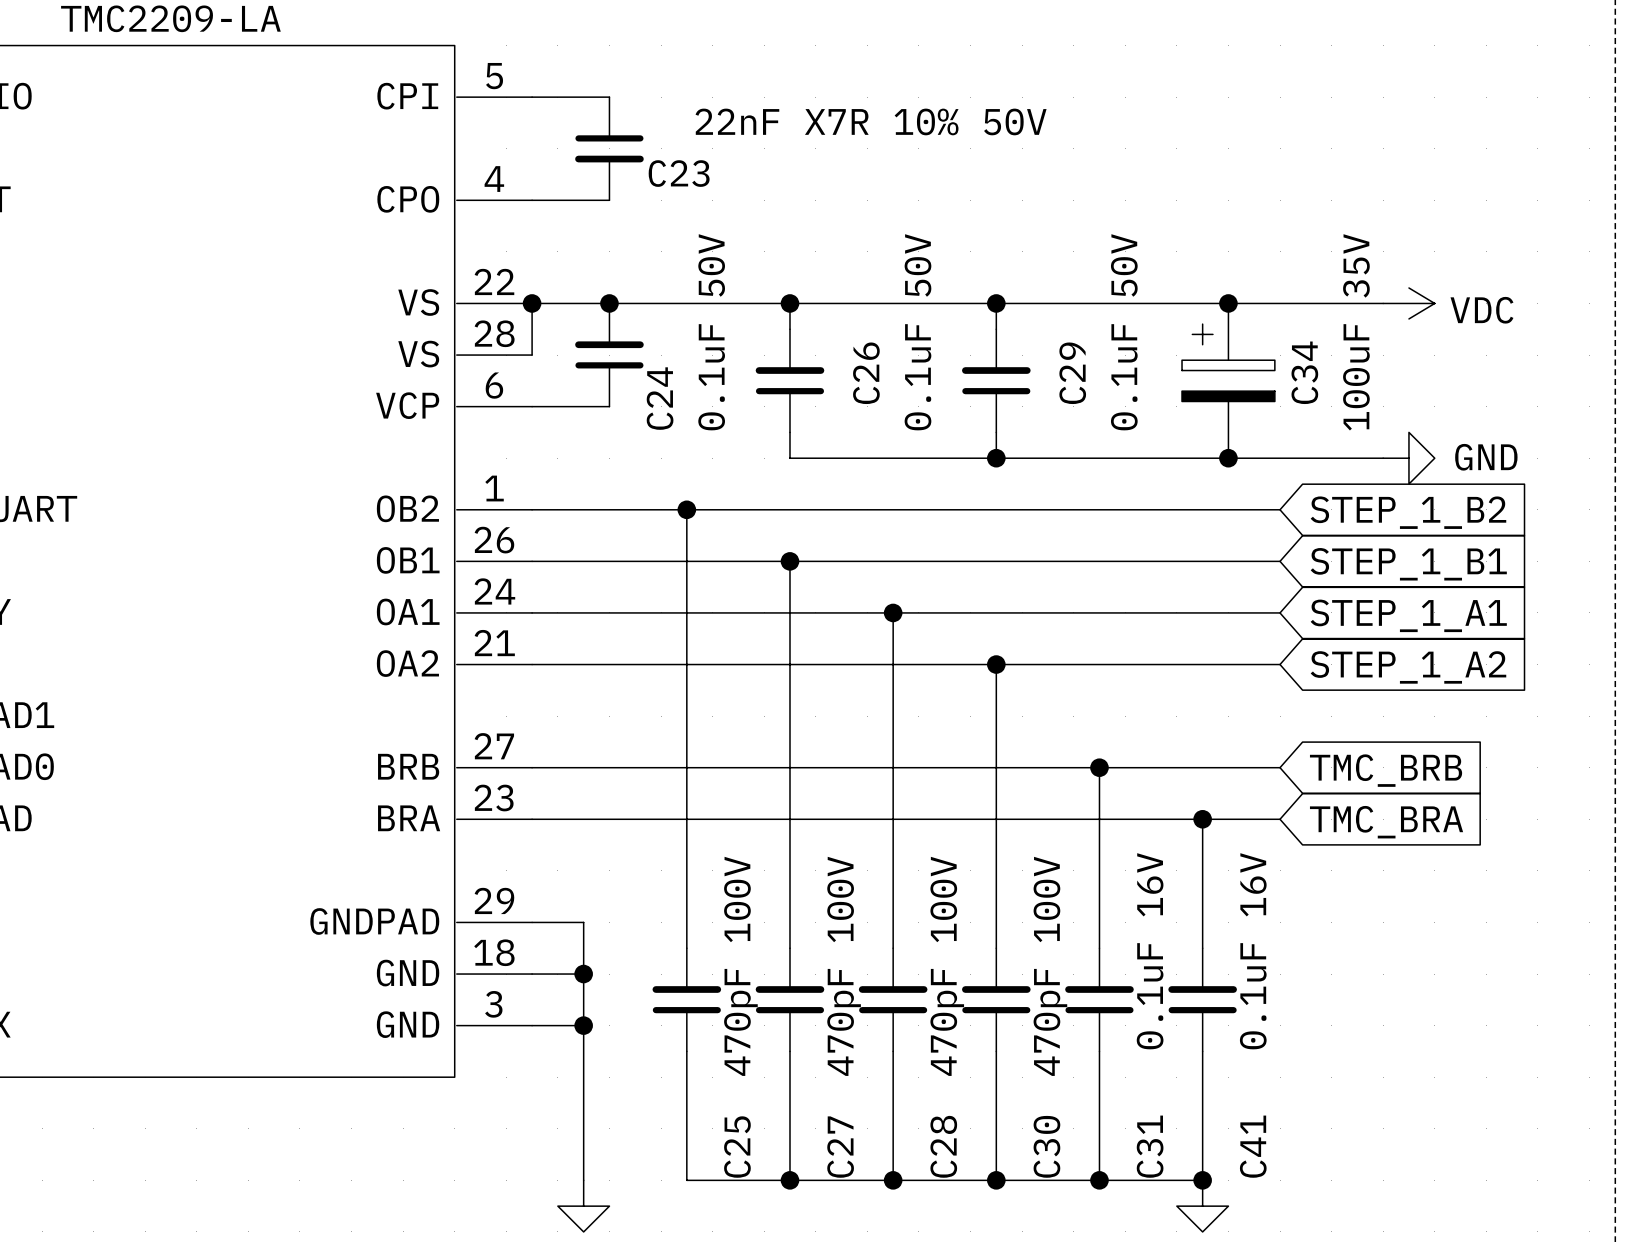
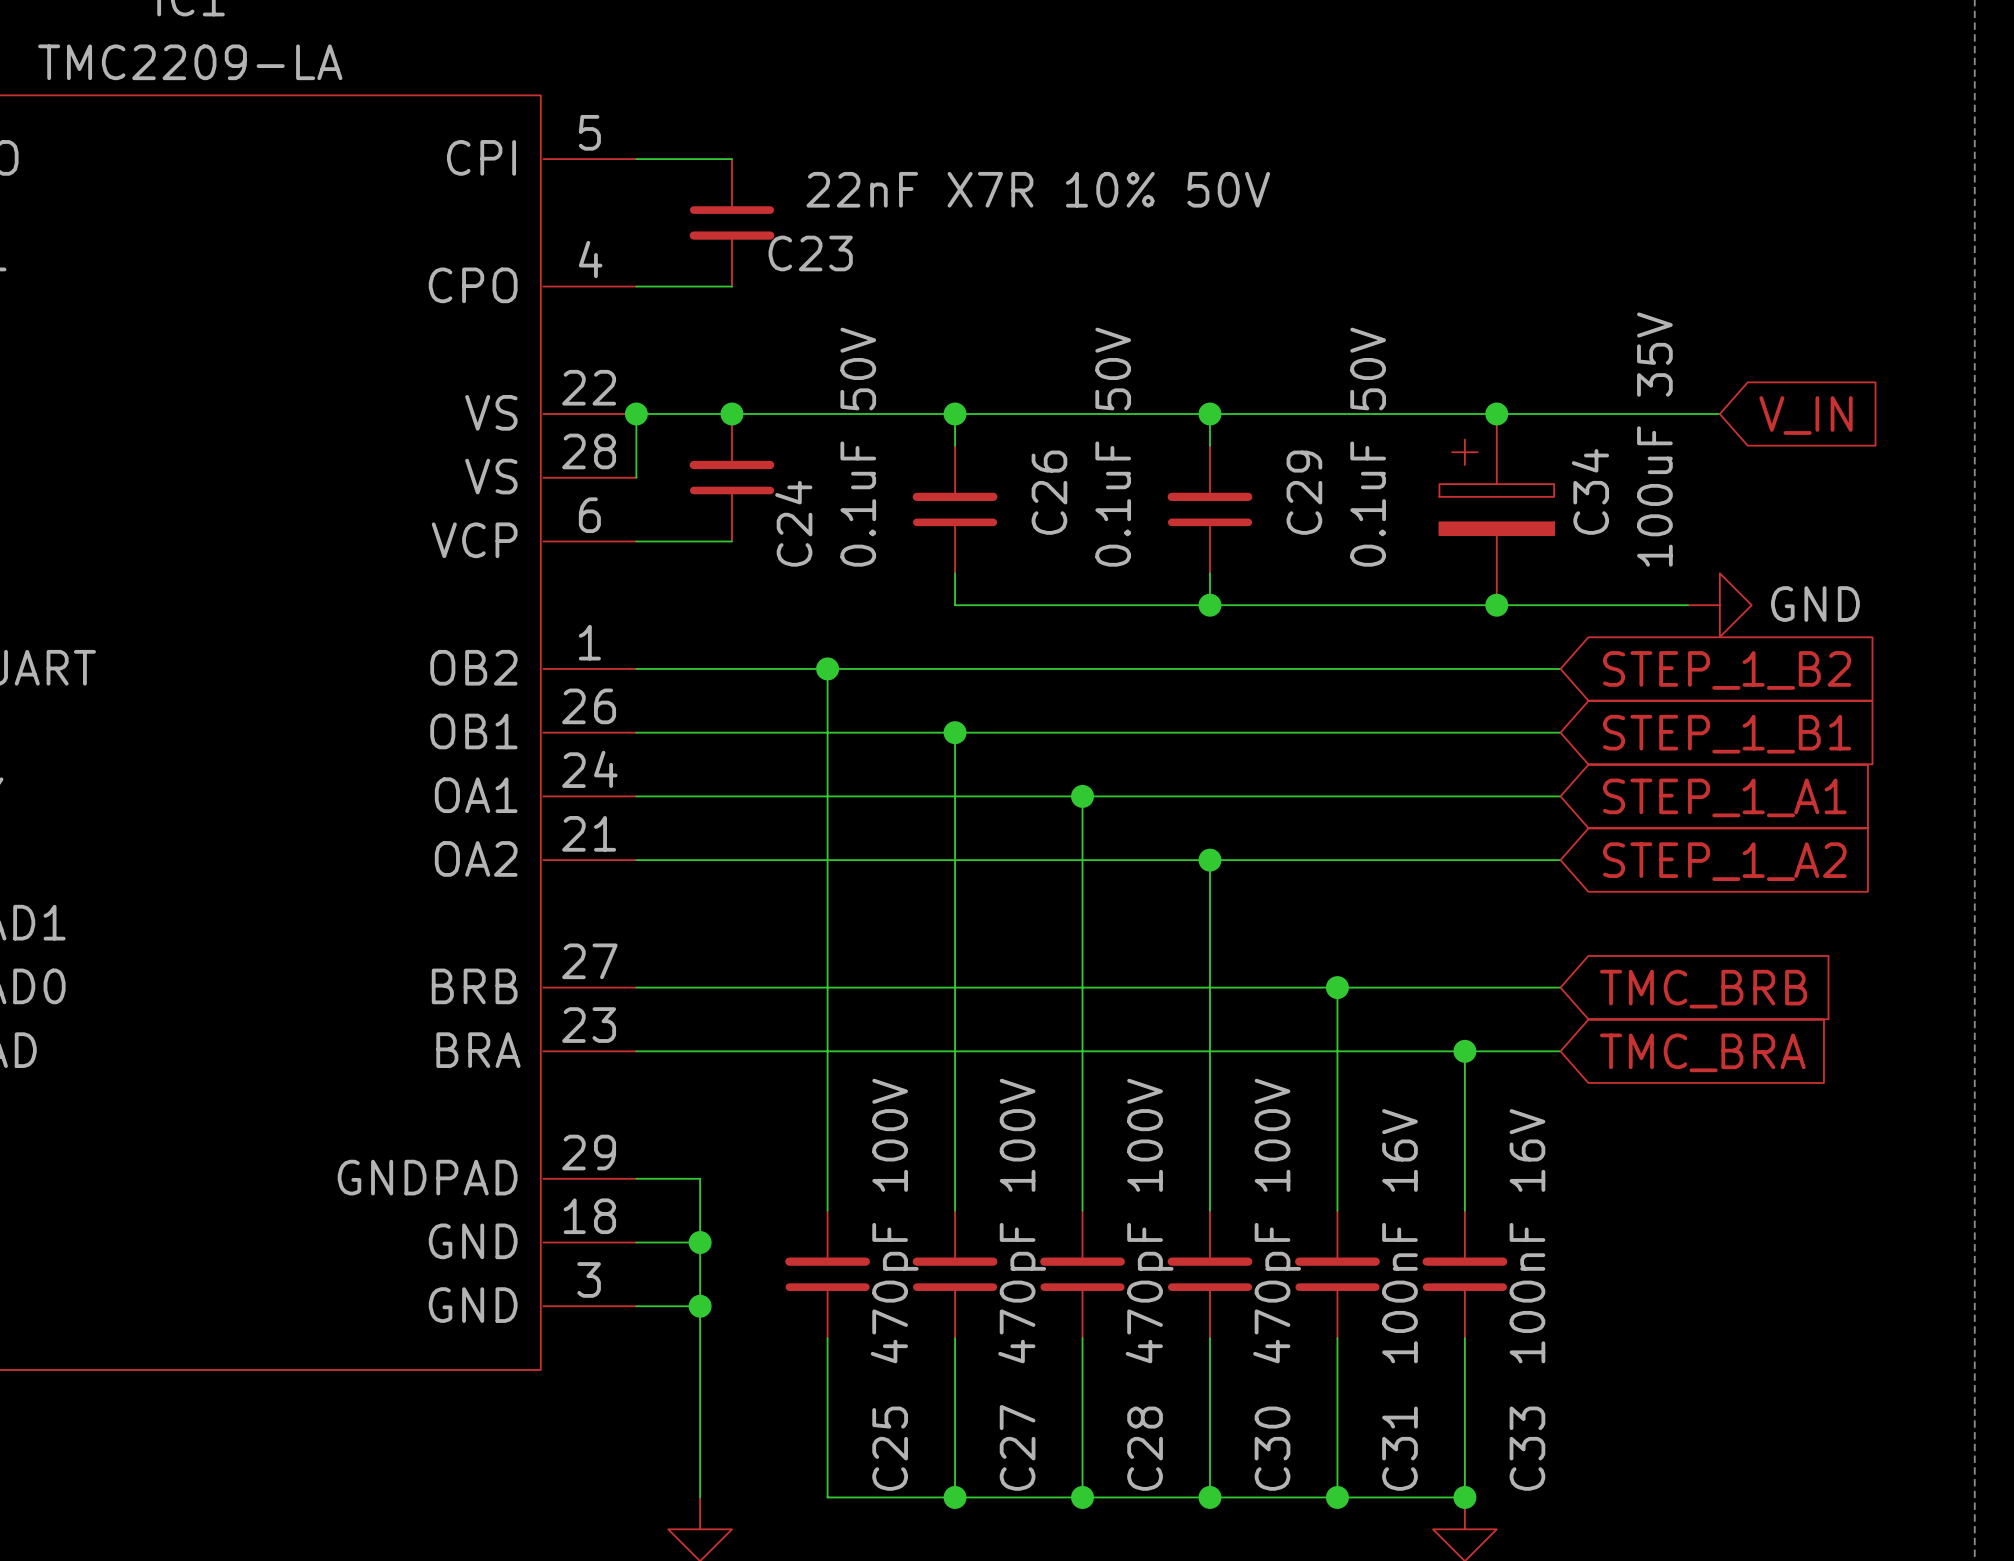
power symbol: VDC (1408, 303) -> none
global label: none -> V_IN (1806, 415)
C31 value: 0.1uF 16V (1150, 951) -> 100nF 16V (1399, 1236)
C41 value: 0.1uF 16V (1253, 951) -> 100nF 16V (1527, 1236)
C41 name: C41 (1253, 1146) -> C33 (1527, 1448)

